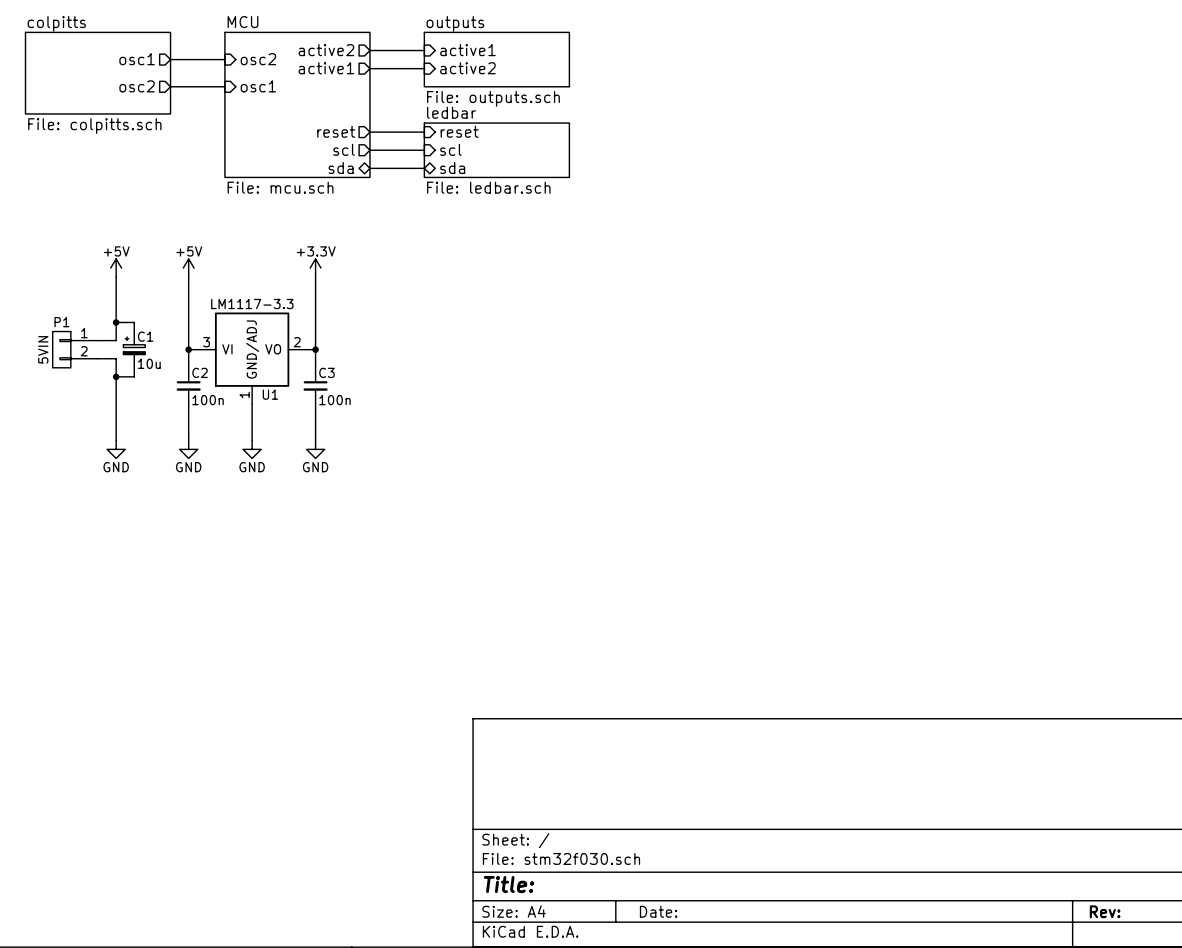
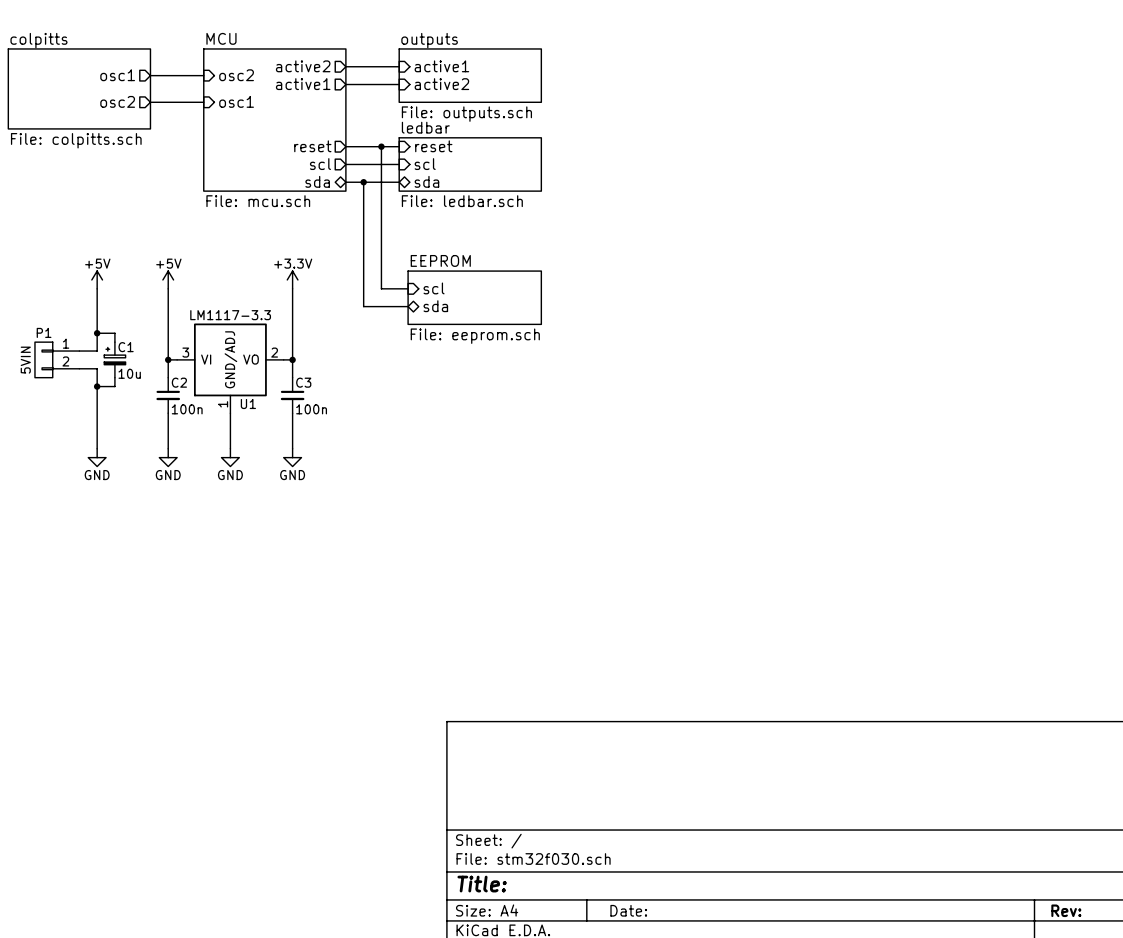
wire: none -> (381, 146) (381, 288) (408, 288)
junction: none -> (381, 146)
wire: none -> (363, 182) (363, 306) (408, 306)
junction: none -> (363, 182)
sheet pin: none -> scl (434, 288)
sheet EEPROM: none -> File: eeprom.sch (474, 297)
sheet pin: none -> sda (435, 306)

